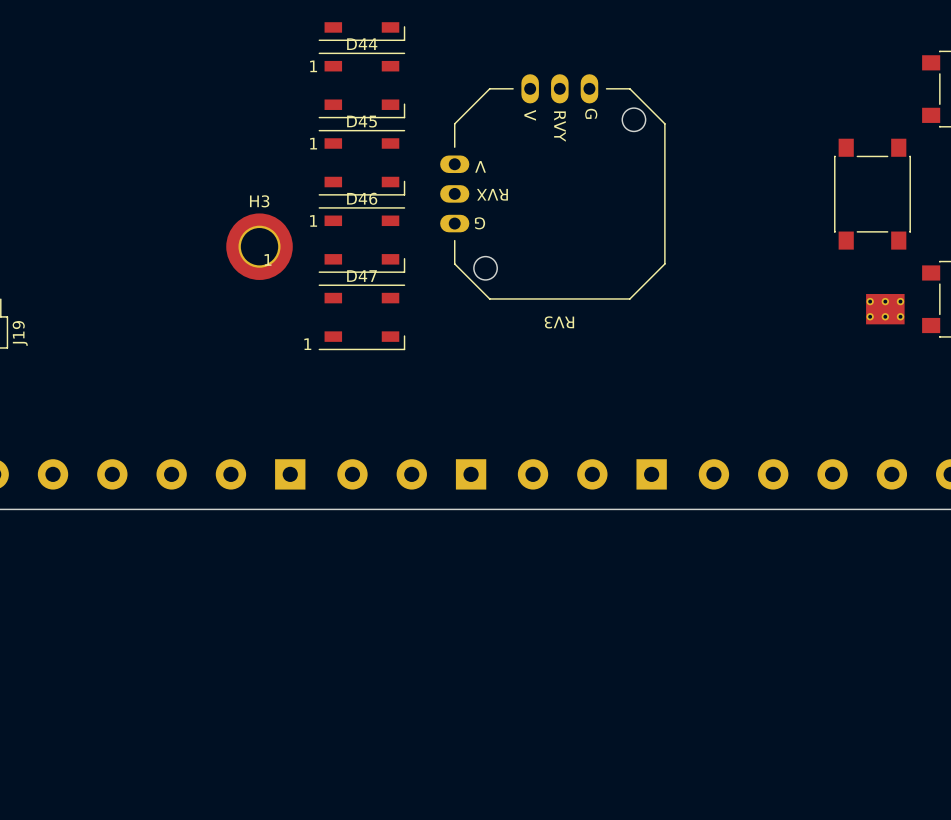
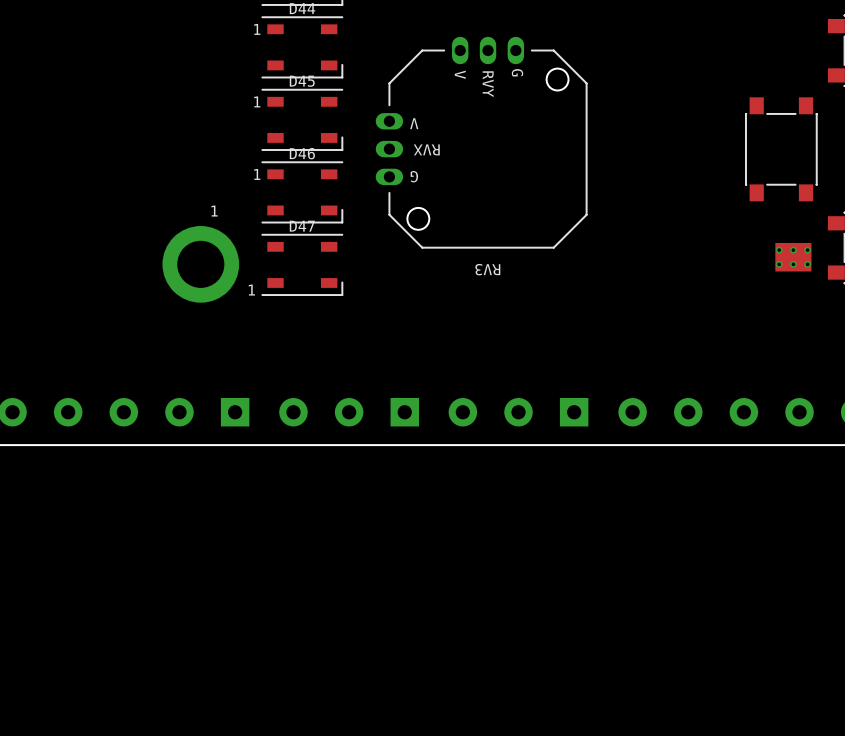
H3: (259, 246) -> none
part: none -> (200, 264)

